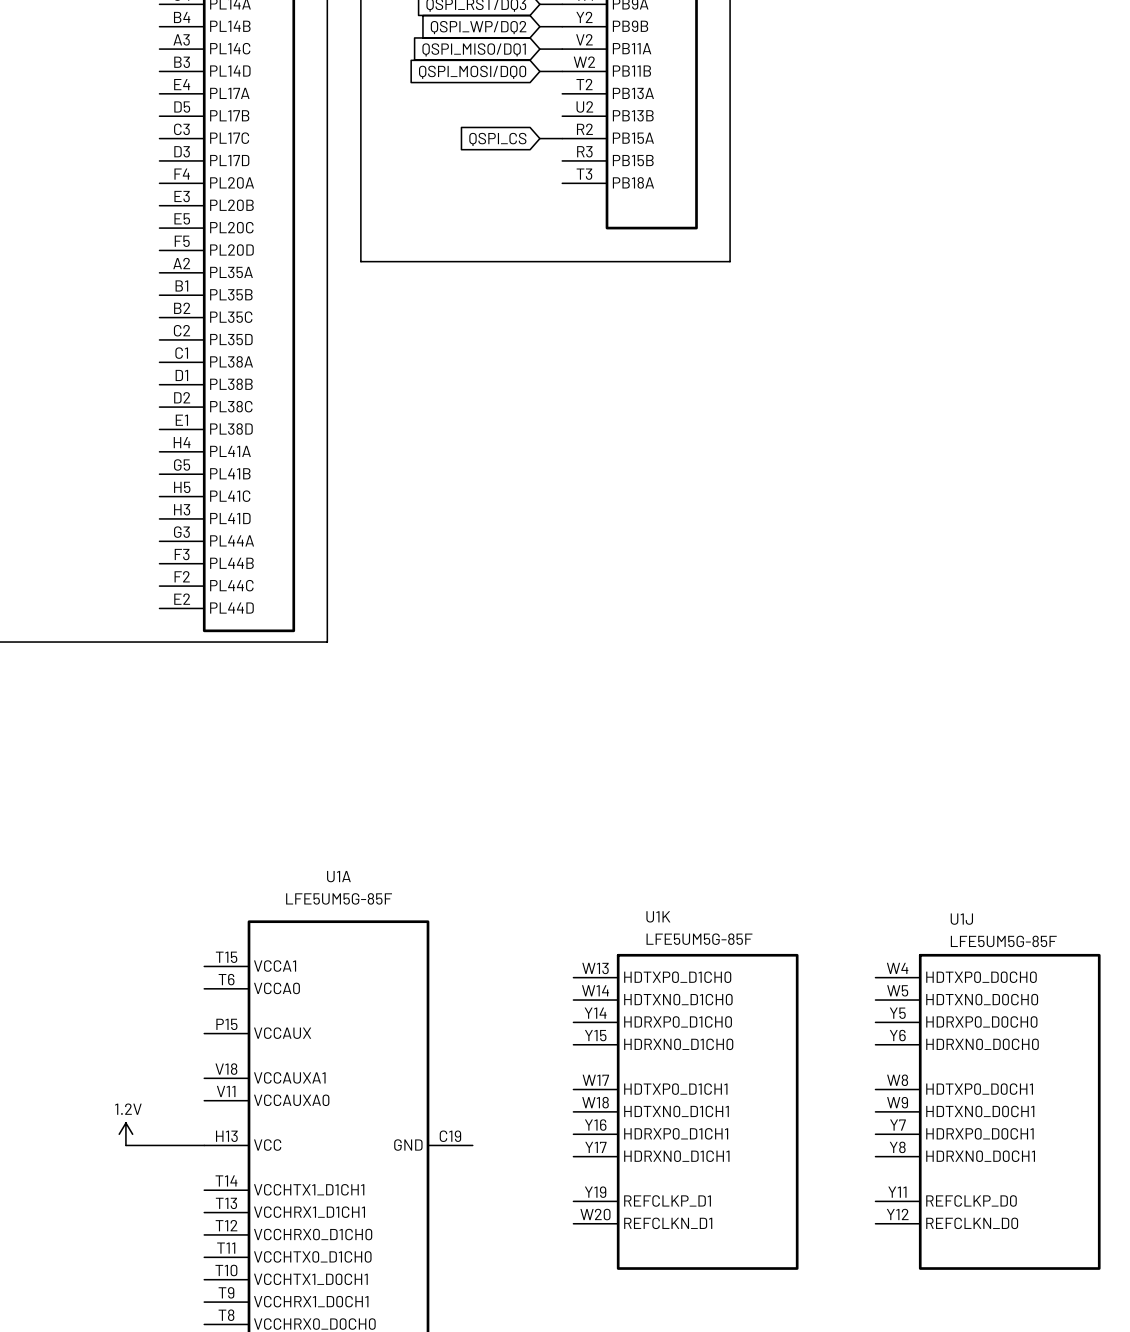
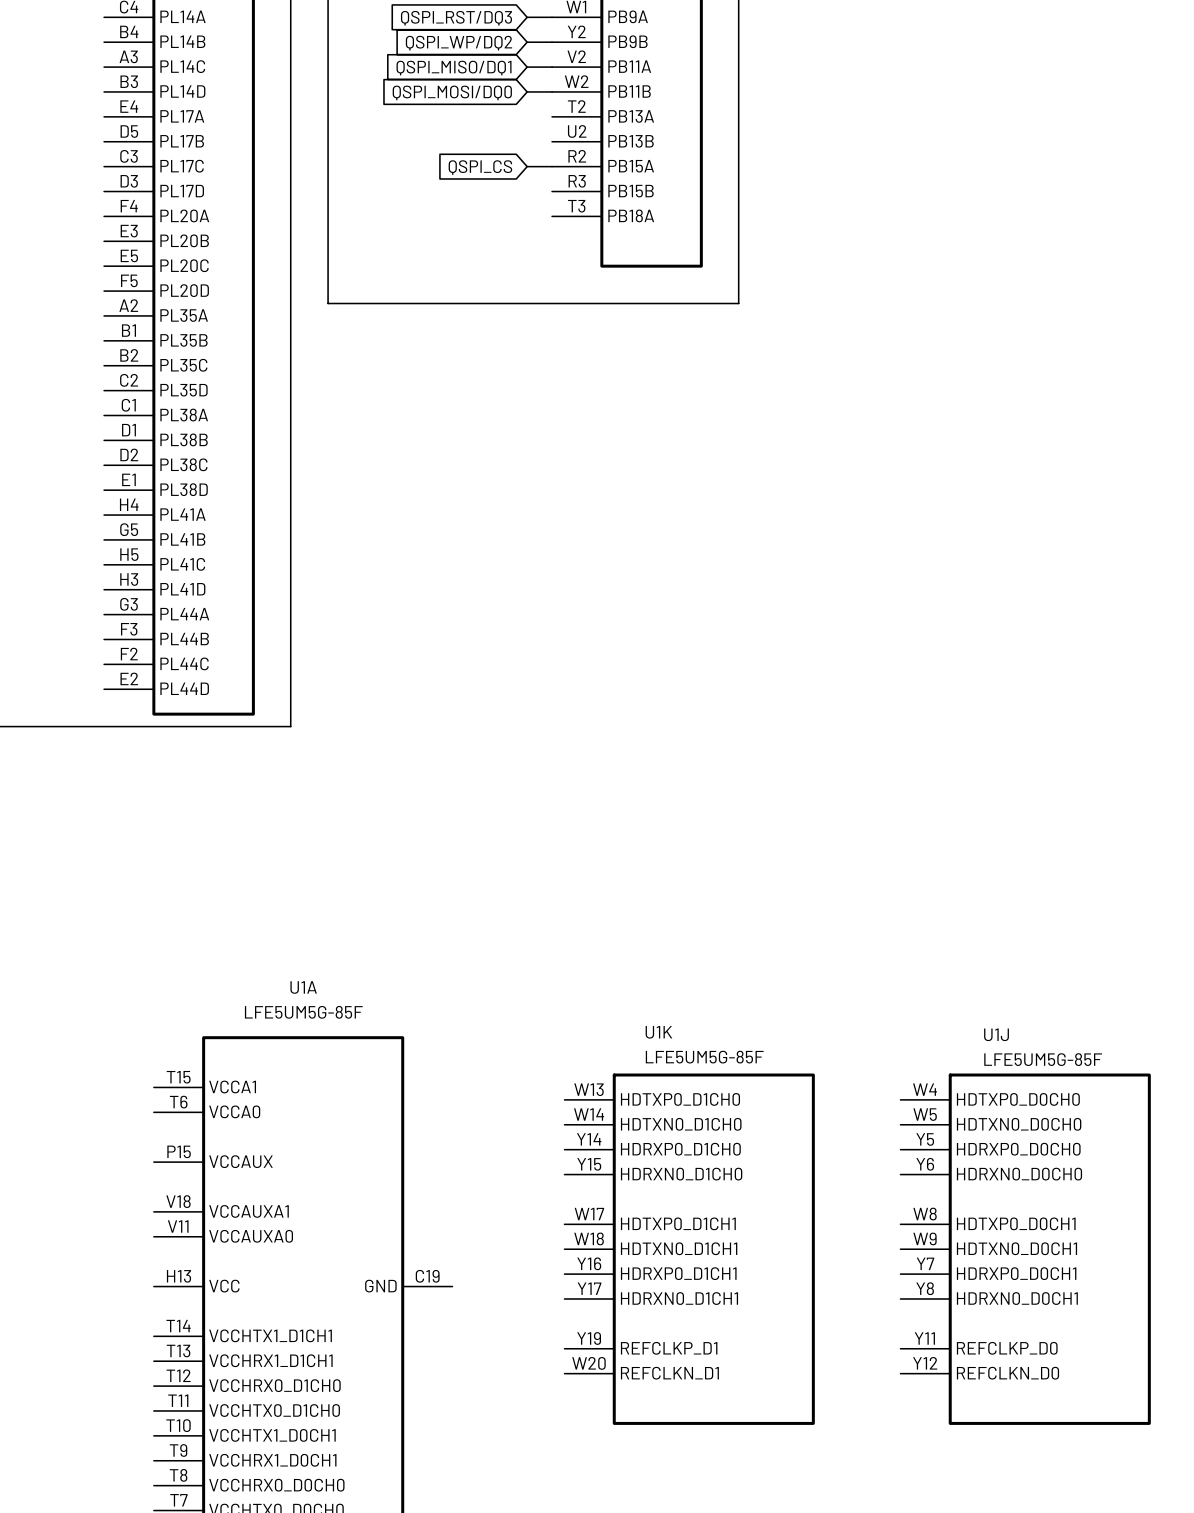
power symbol: 1.2V (125, 1134) -> none
wire: (125, 1145) (204, 1145) -> none

